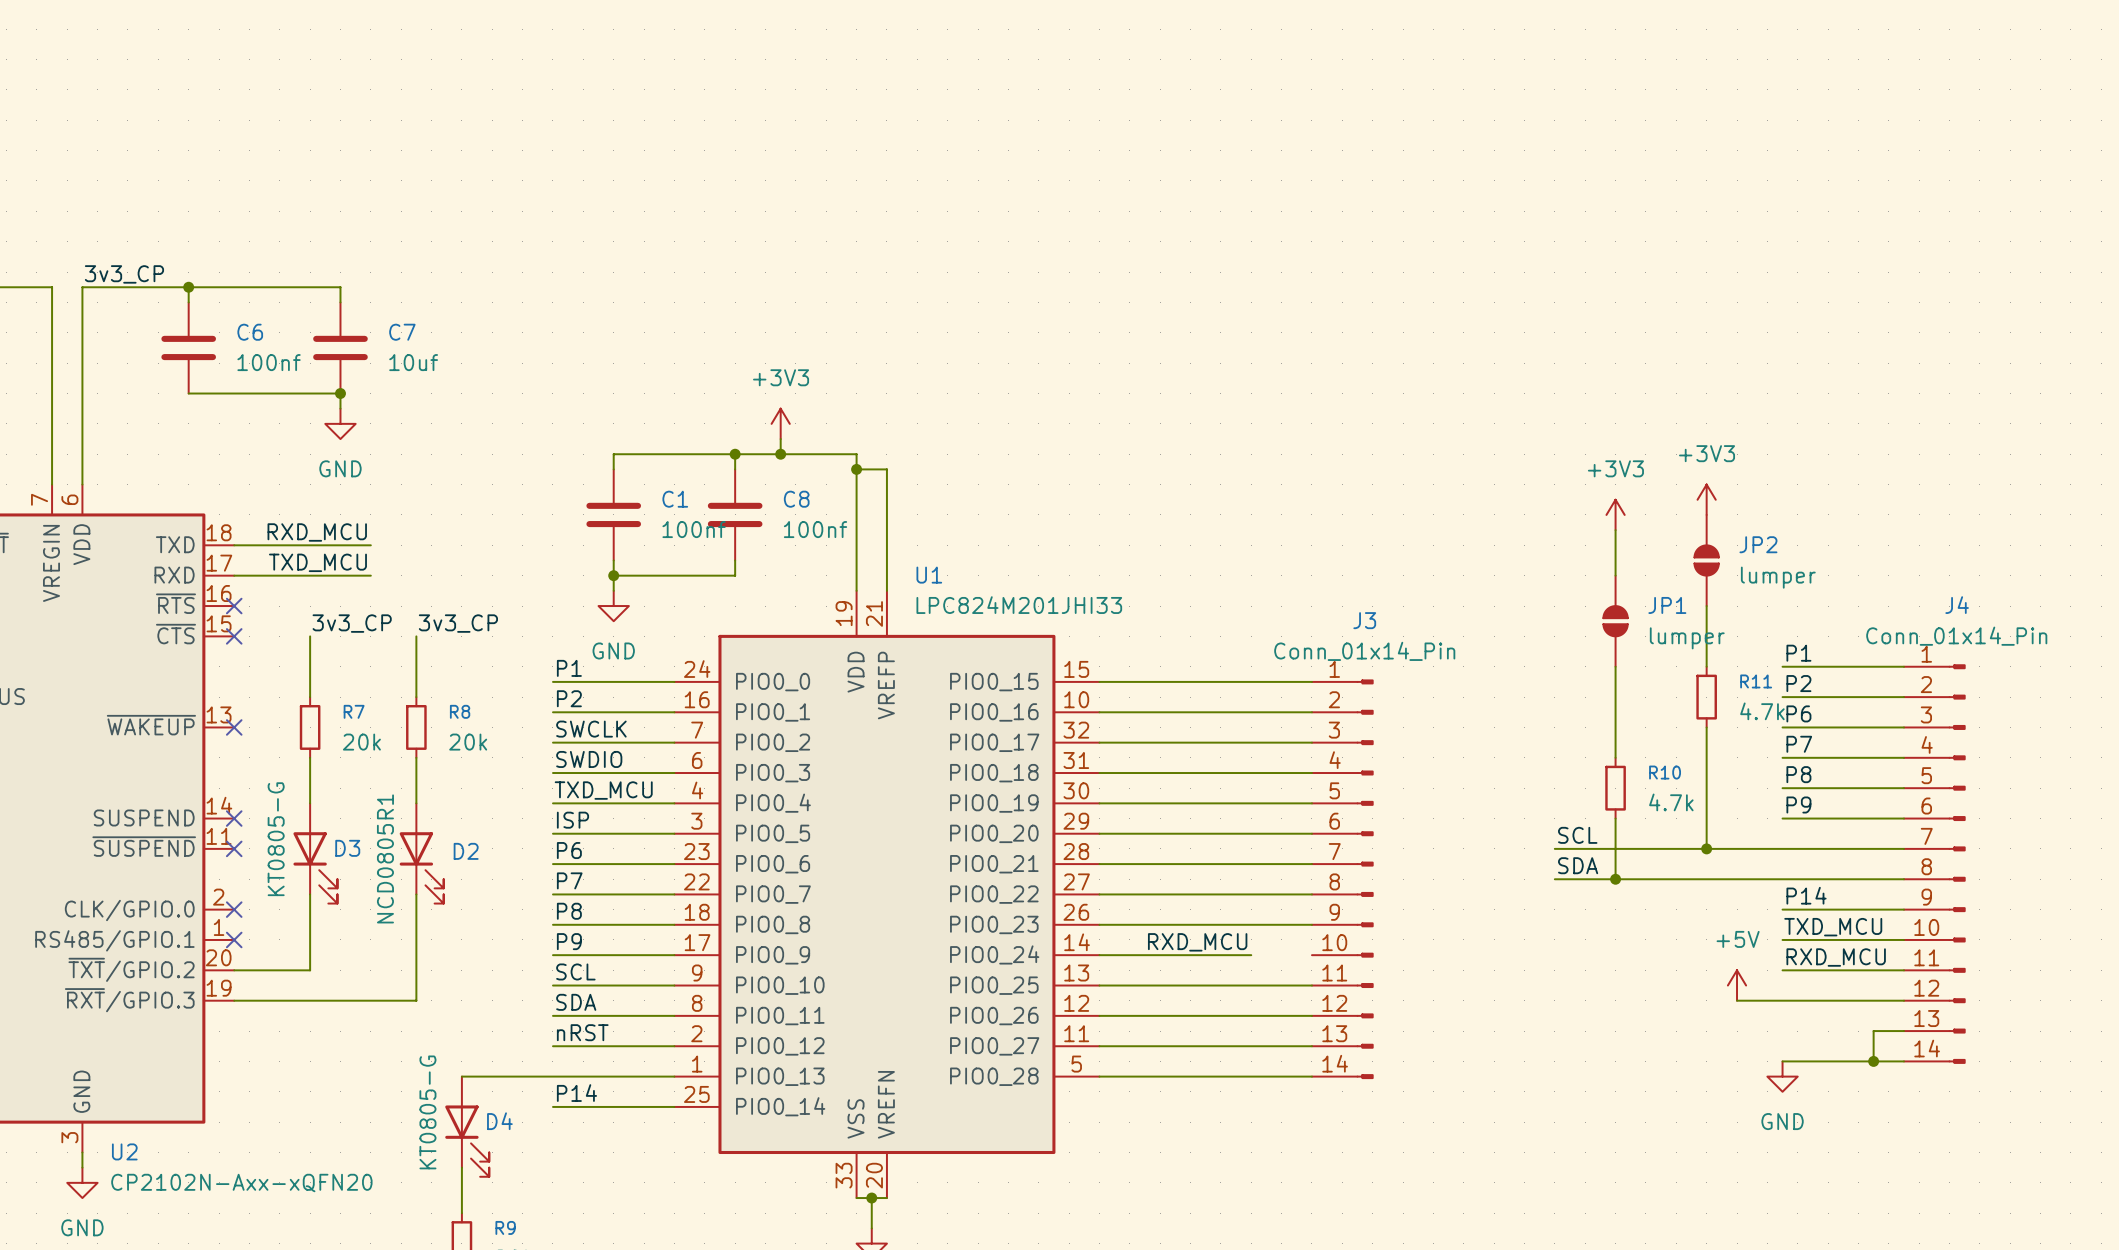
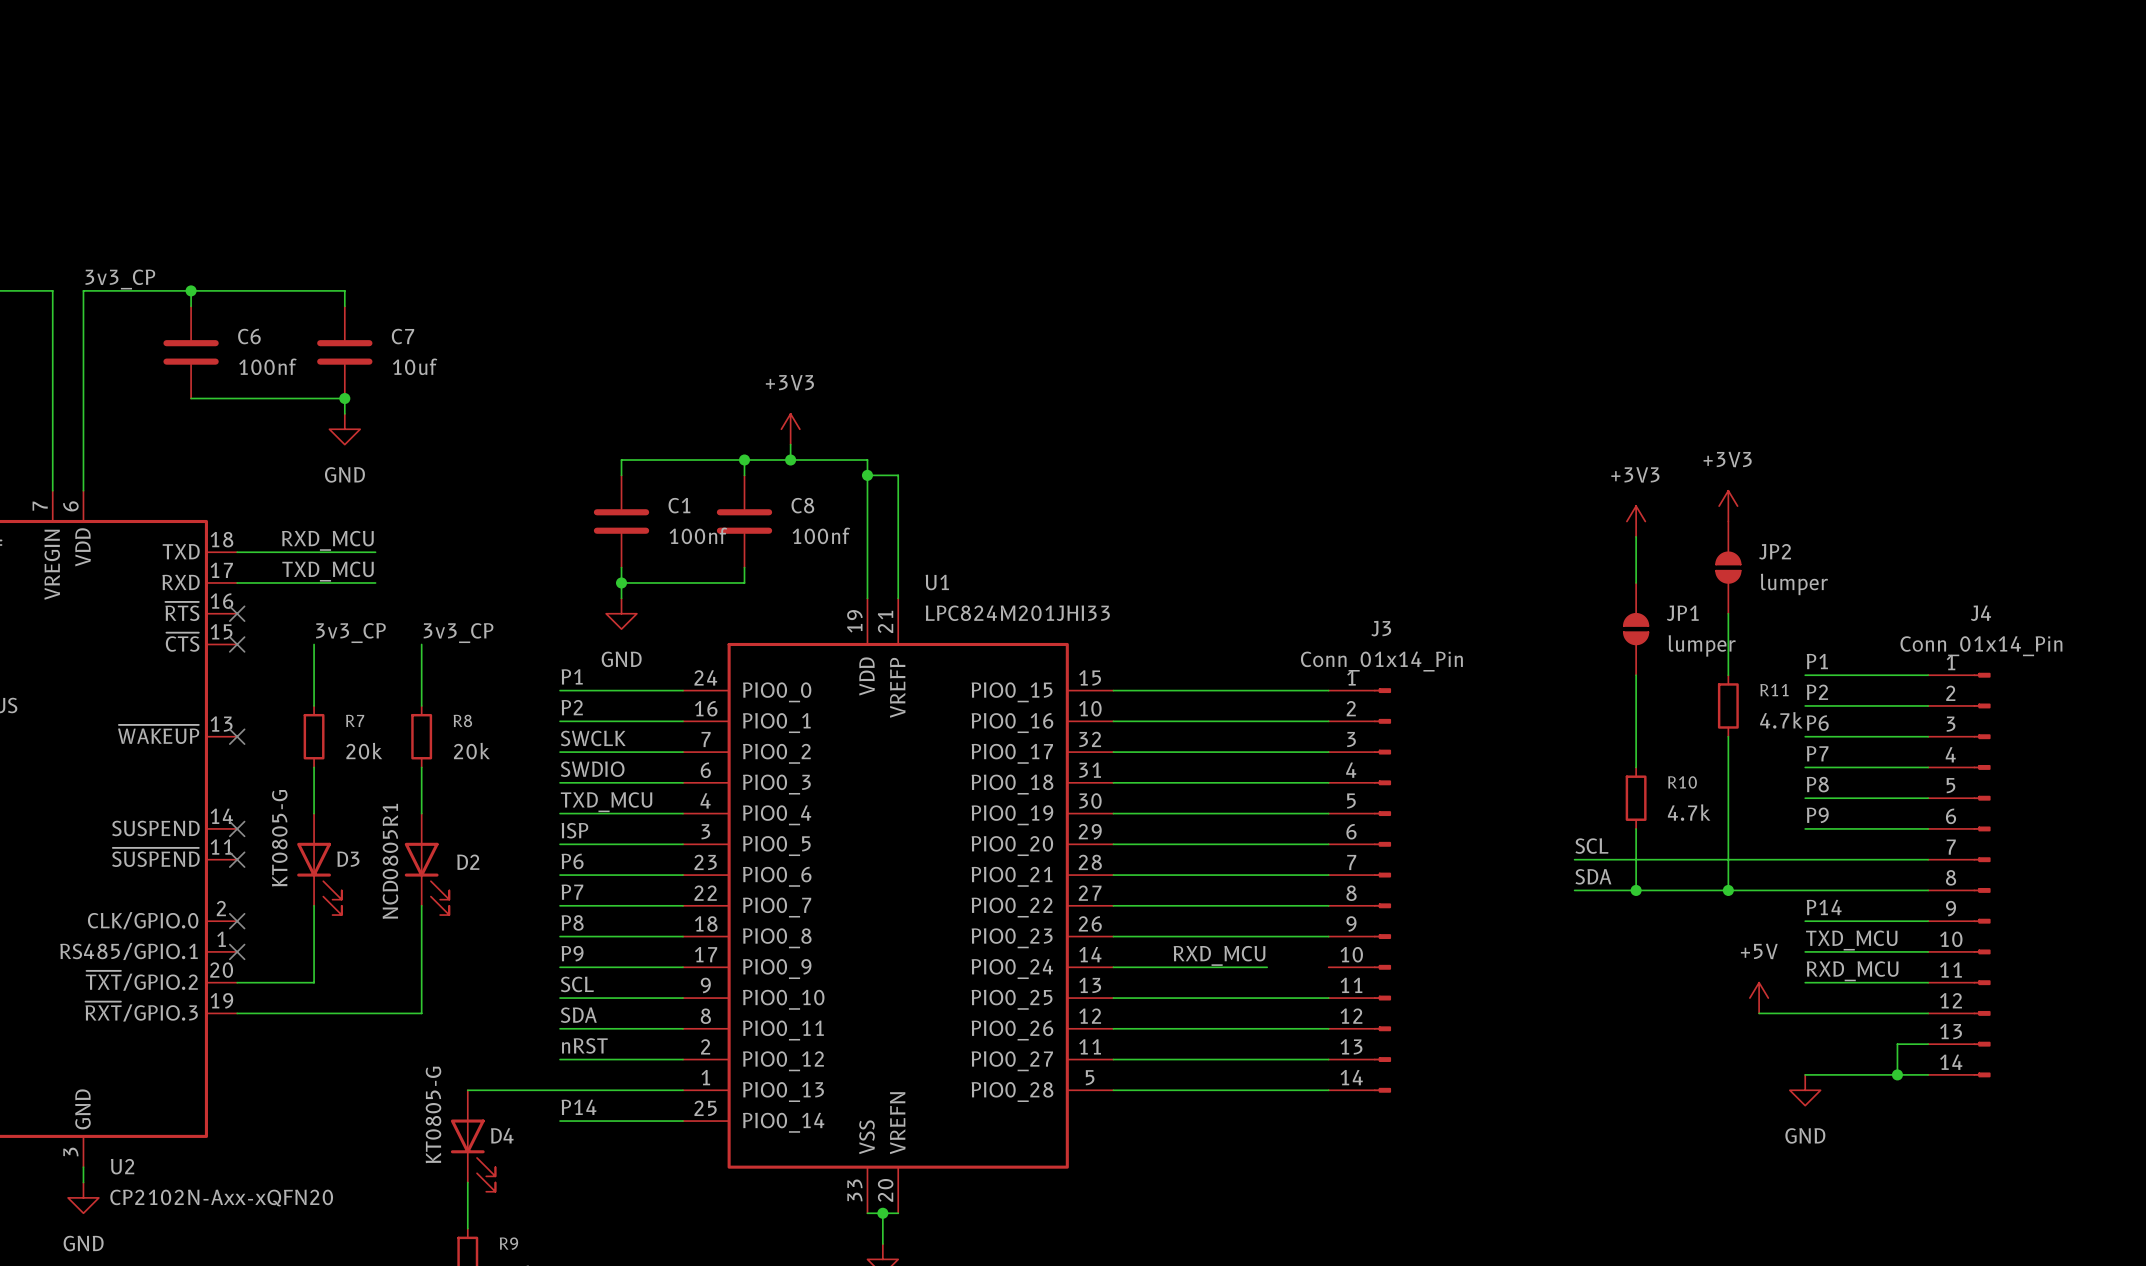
wire: none -> (1728, 859) (1728, 890)
junction position: (1706, 848) -> (1728, 890)

